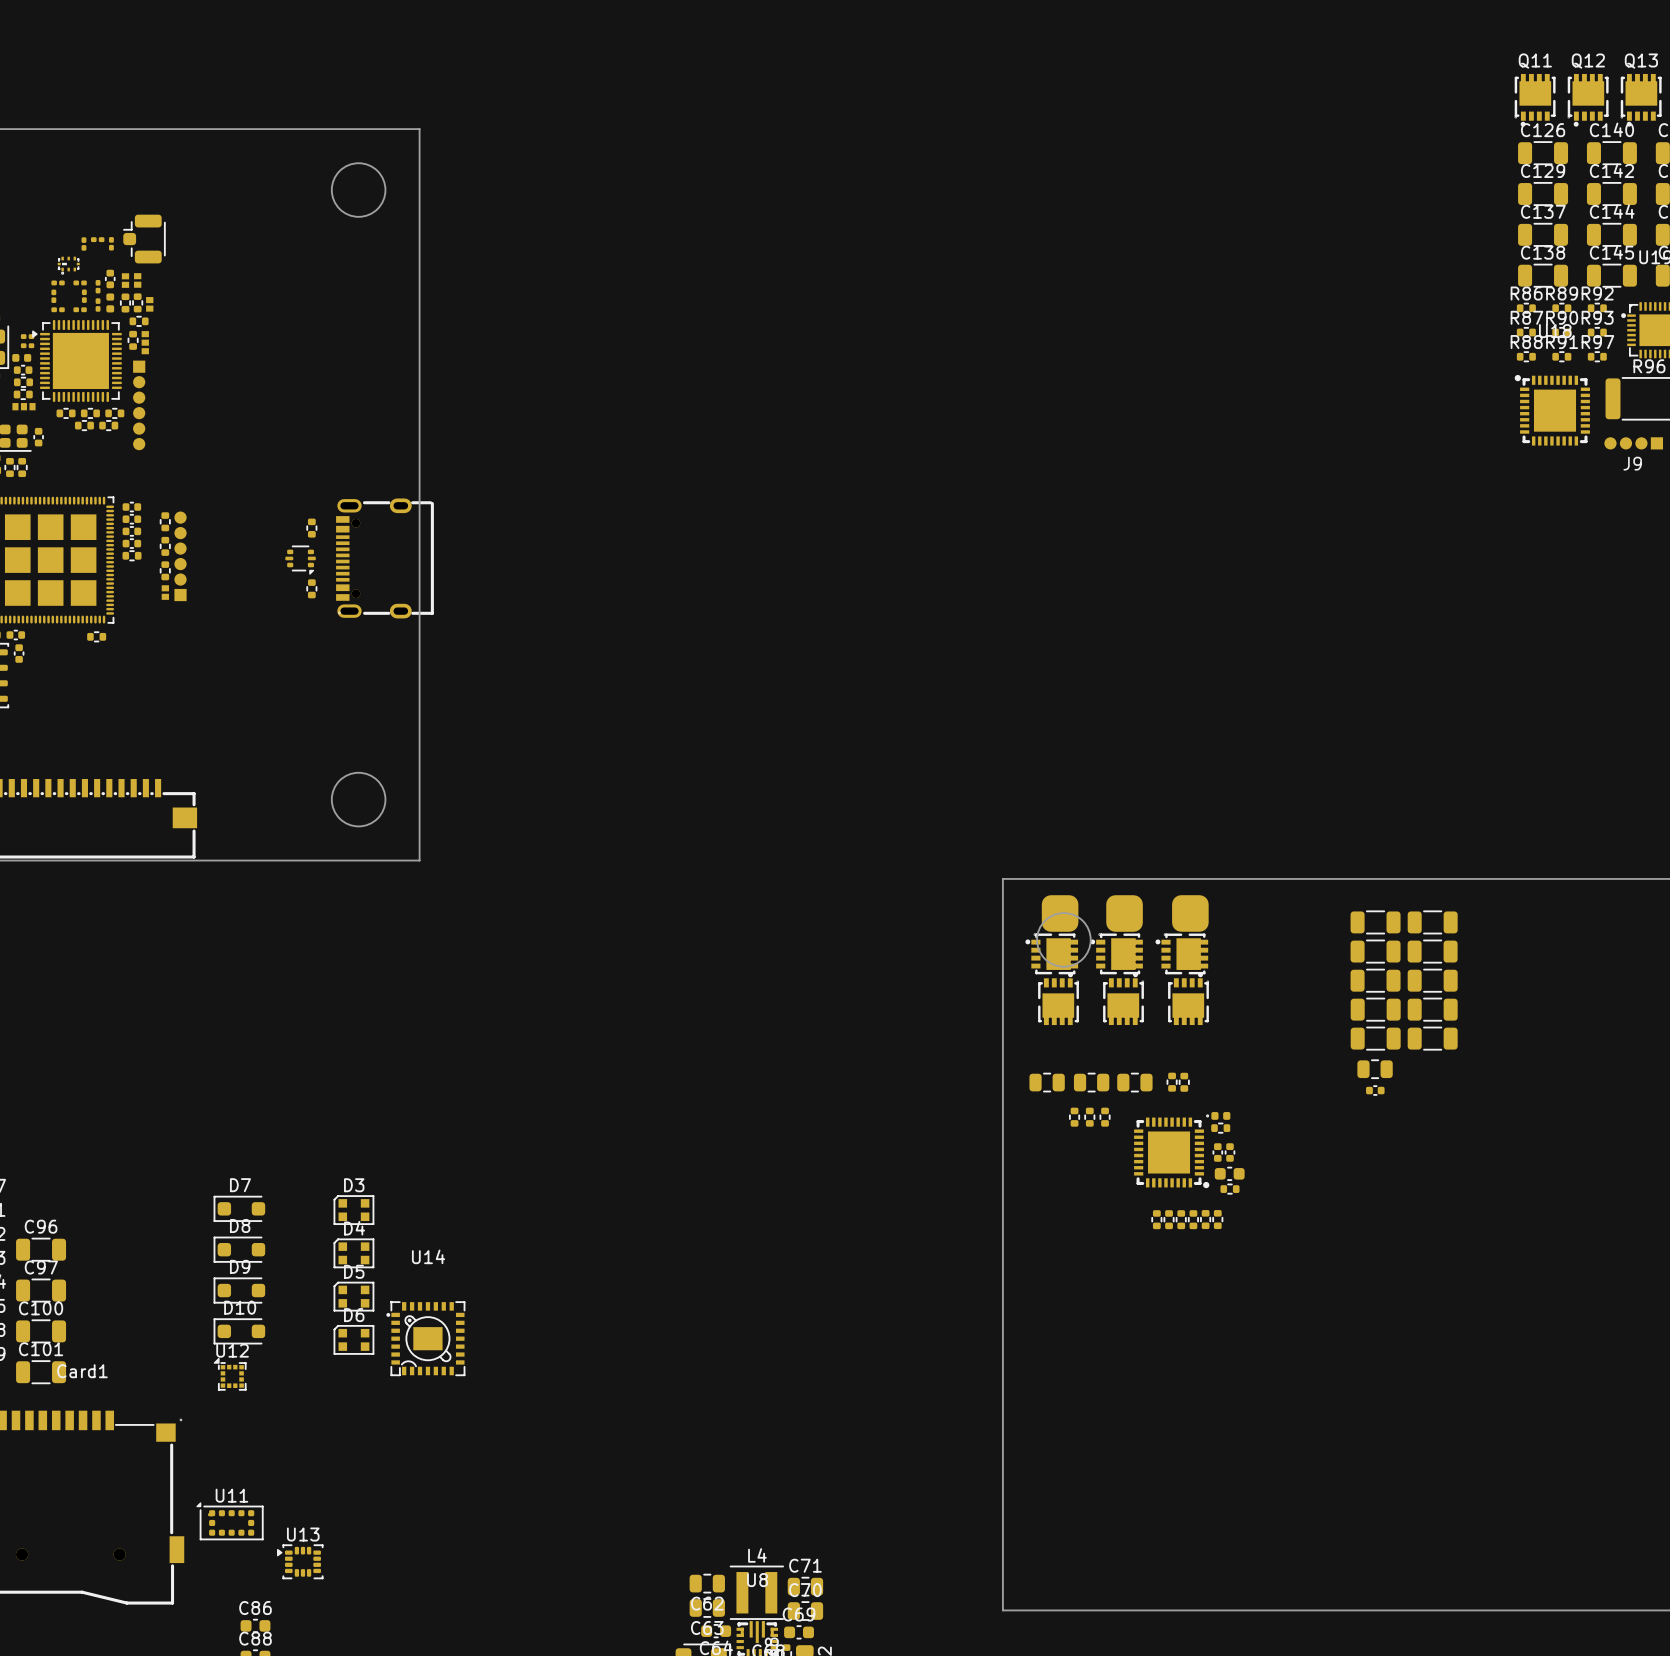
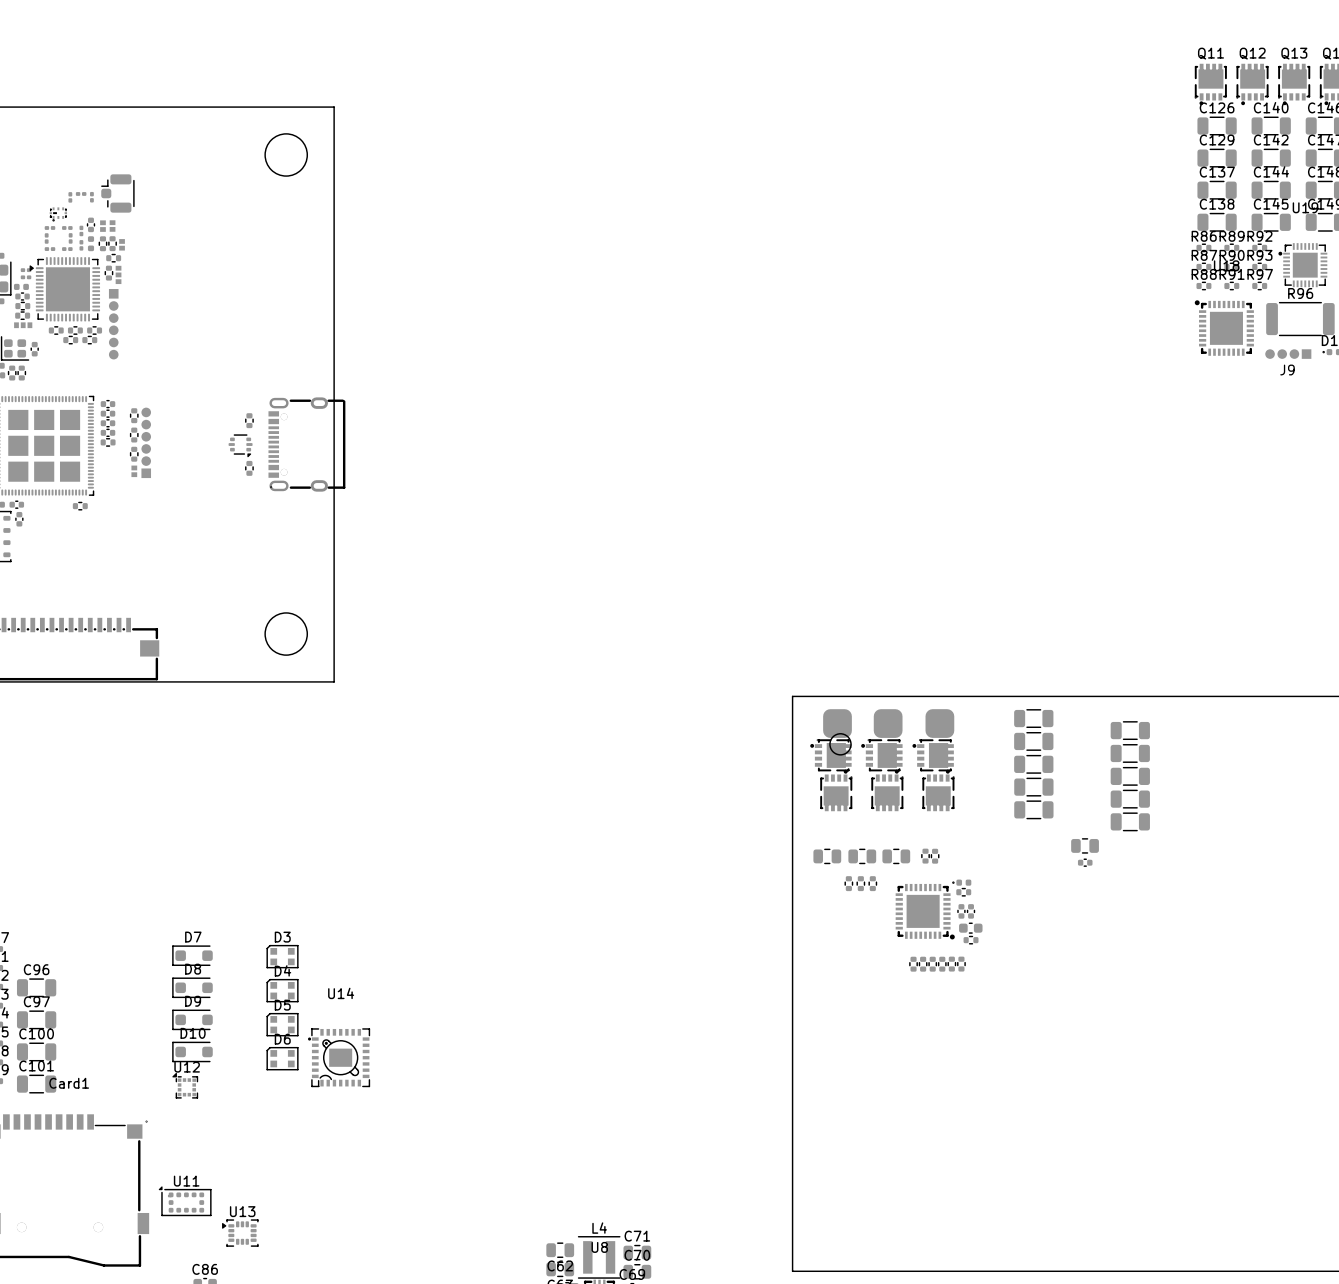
part: none -> (1033, 718)
round board edge size: [1036, 912, 1092, 968] -> [829, 733, 852, 756]
part: (1375, 922) -> none
part: none -> (1033, 741)
part: (1375, 951) -> none
part: none -> (1033, 764)
part: (1375, 980) -> none
part: none -> (1033, 787)
part: (1375, 1009) -> none
part: none -> (1033, 809)
part: (1375, 1038) -> none

